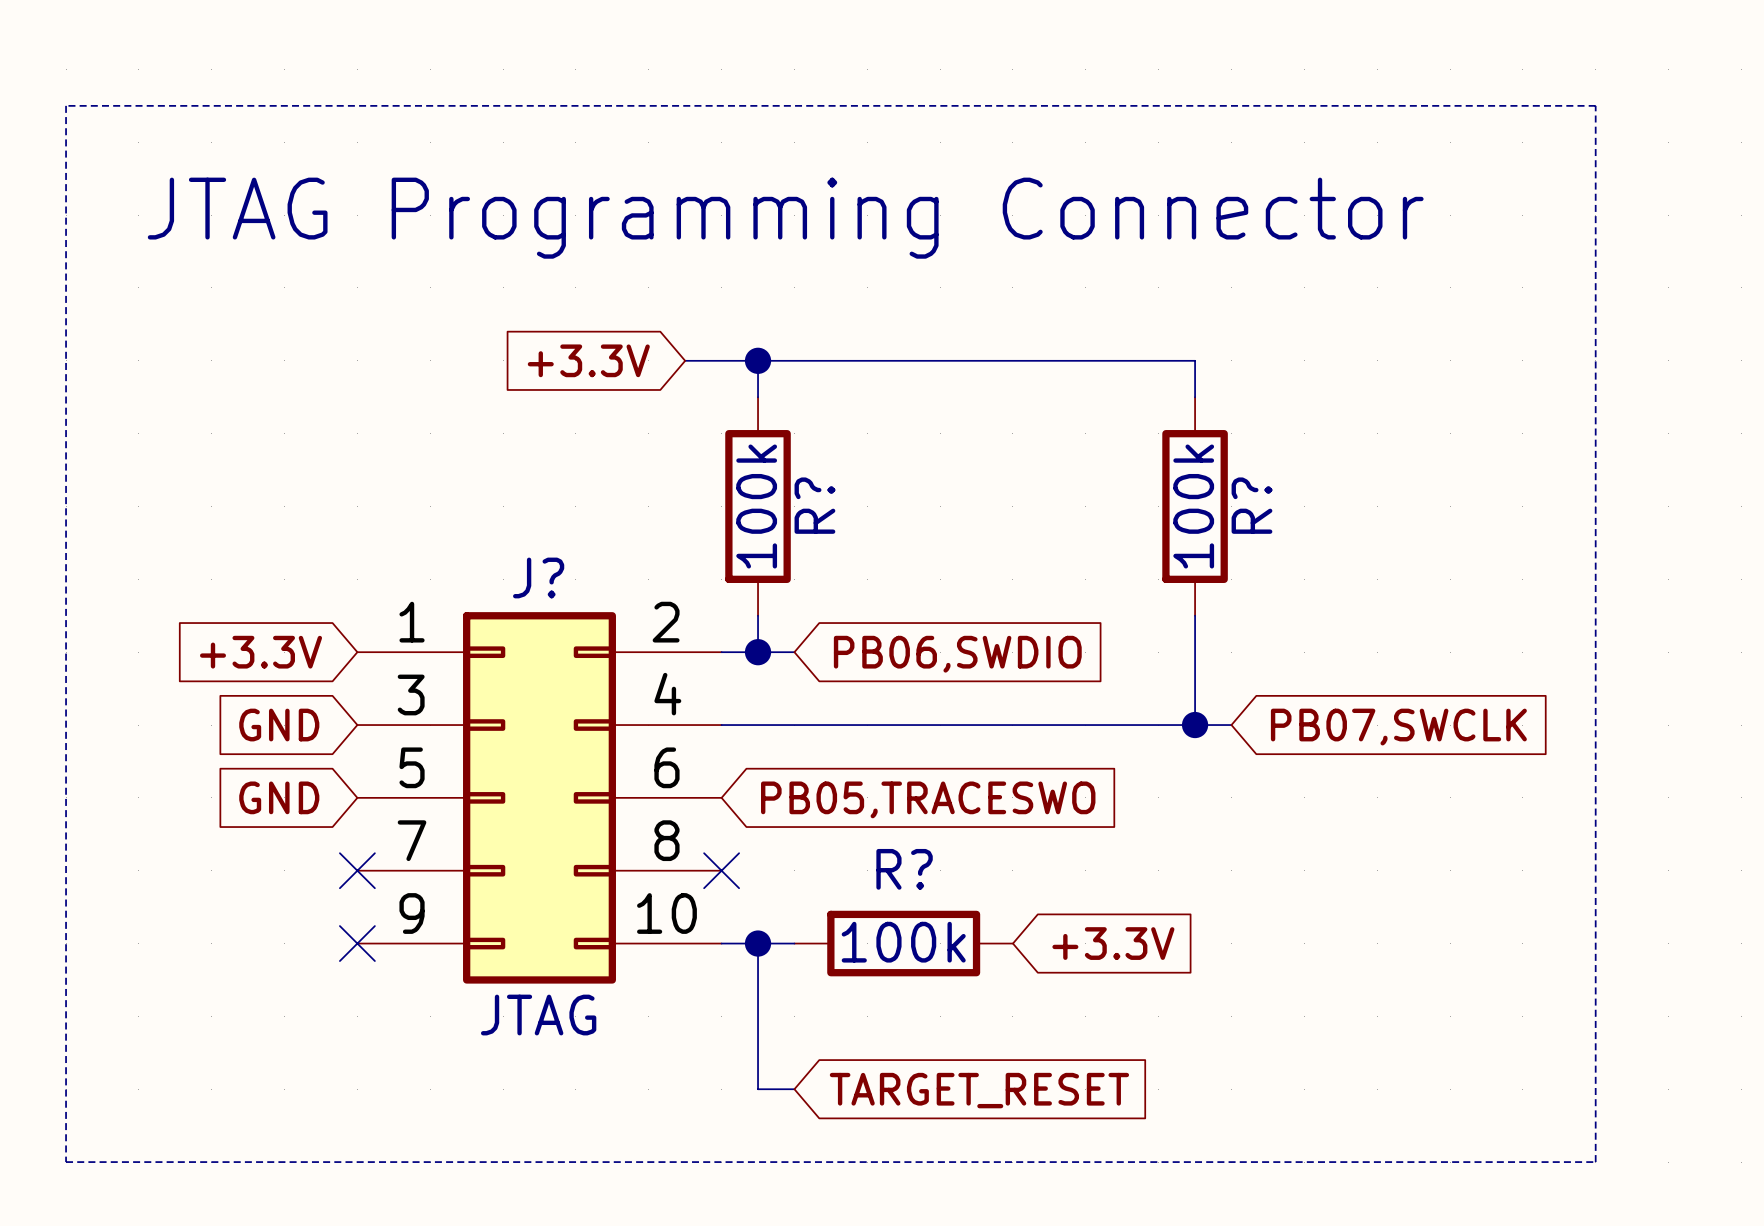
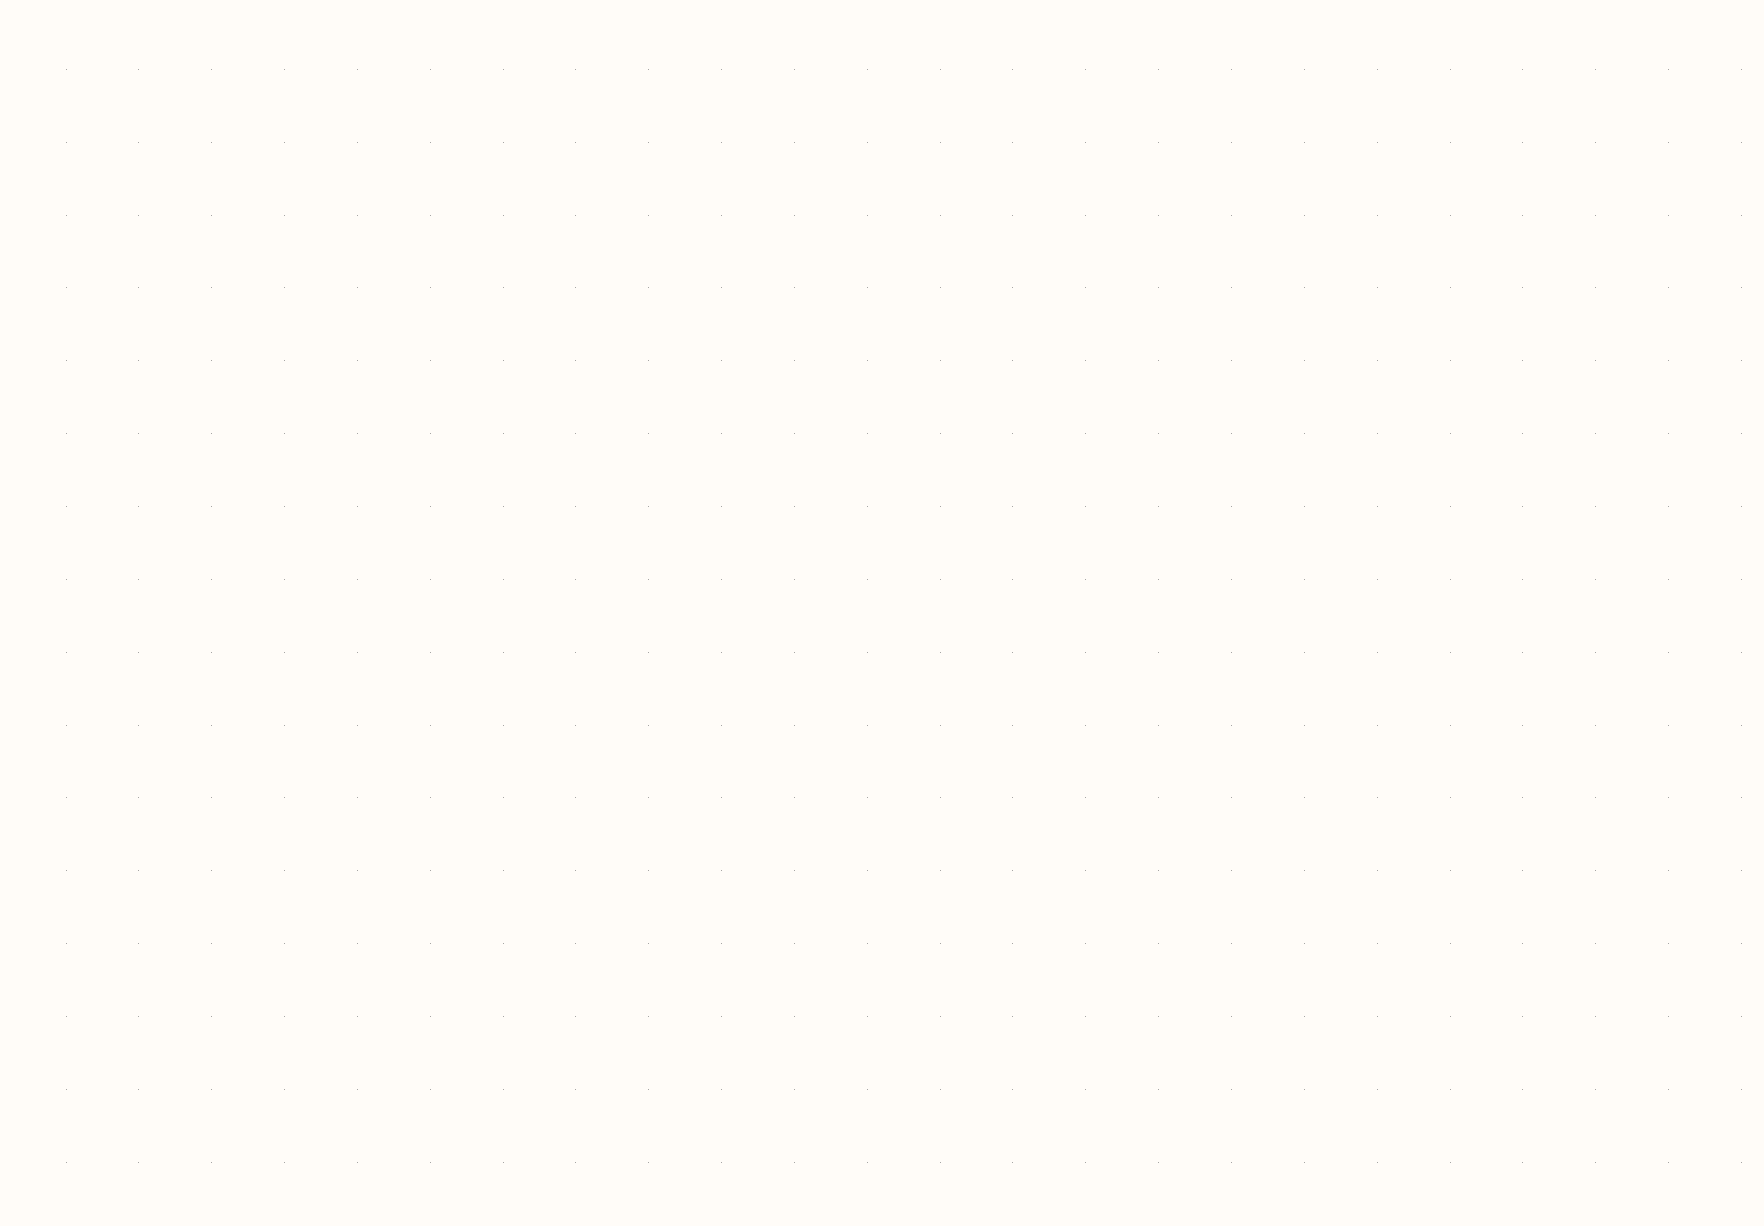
line: (66, 105) (66, 1162) (1595, 1162) (1595, 105) (66, 105) -> none
text: JTAG Programming Connector (785, 218) -> none
global label: +3.3V (588, 360) -> none
wire: (685, 360) (1195, 360) (1195, 397) -> none
wire: (758, 360) (758, 397) -> none
junction: (758, 360) -> none
R?: 100k (758, 506) -> none
R?: 100k (1195, 506) -> none
wire: (758, 615) (758, 652) -> none
wire: (1195, 615) (1195, 725) -> none
global label: +3.3V (261, 652) -> none
wire: (721, 652) (794, 652) -> none
junction: (758, 652) -> none
global label: PB06,SWDIO (957, 654) -> none
global label: GND (279, 725) -> none
wire: (721, 725) (1231, 725) -> none
junction: (1195, 725) -> none
global label: PB07,SWCLK (1398, 727) -> none
global label: GND (279, 797) -> none
J?: JTAG (539, 797) -> none
global label: PB05,TRACESWO (928, 799) -> none
no-connect mark: (357, 870) -> none
no-connect mark: (721, 870) -> none
no-connect mark: (357, 943) -> none
wire: (721, 943) (794, 943) -> none
wire: (758, 943) (758, 1089) (794, 1089) -> none
junction: (758, 943) -> none
R?: 100k (903, 943) -> none
global label: +3.3V (1113, 943) -> none
global label: TARGET_RESET (979, 1090) -> none

